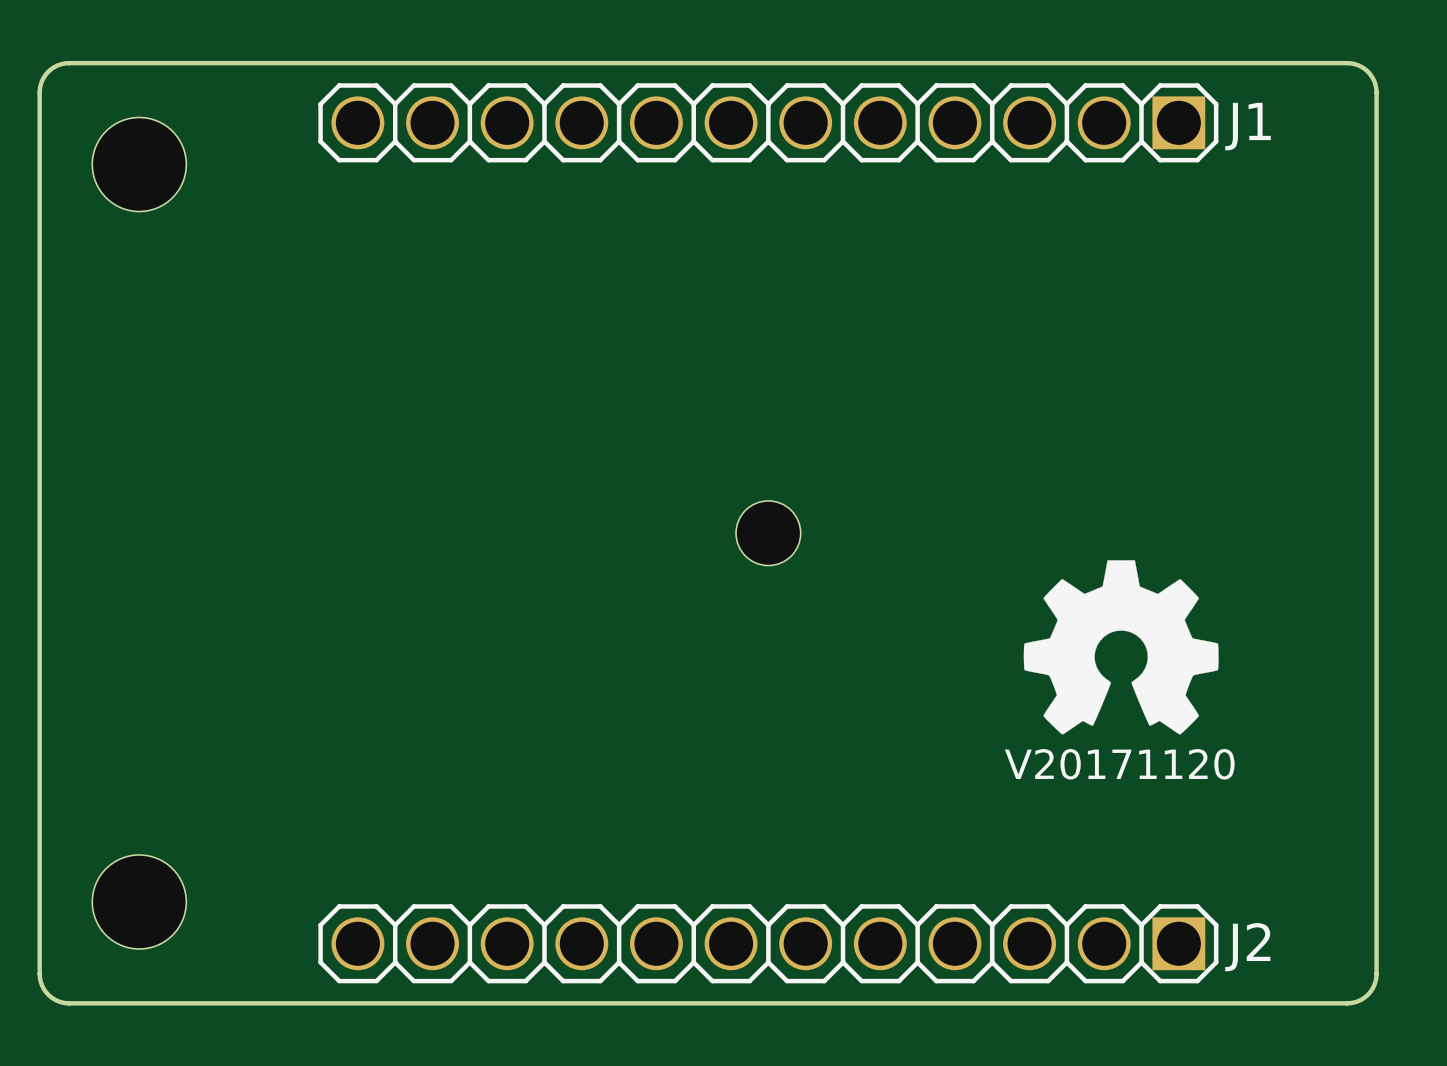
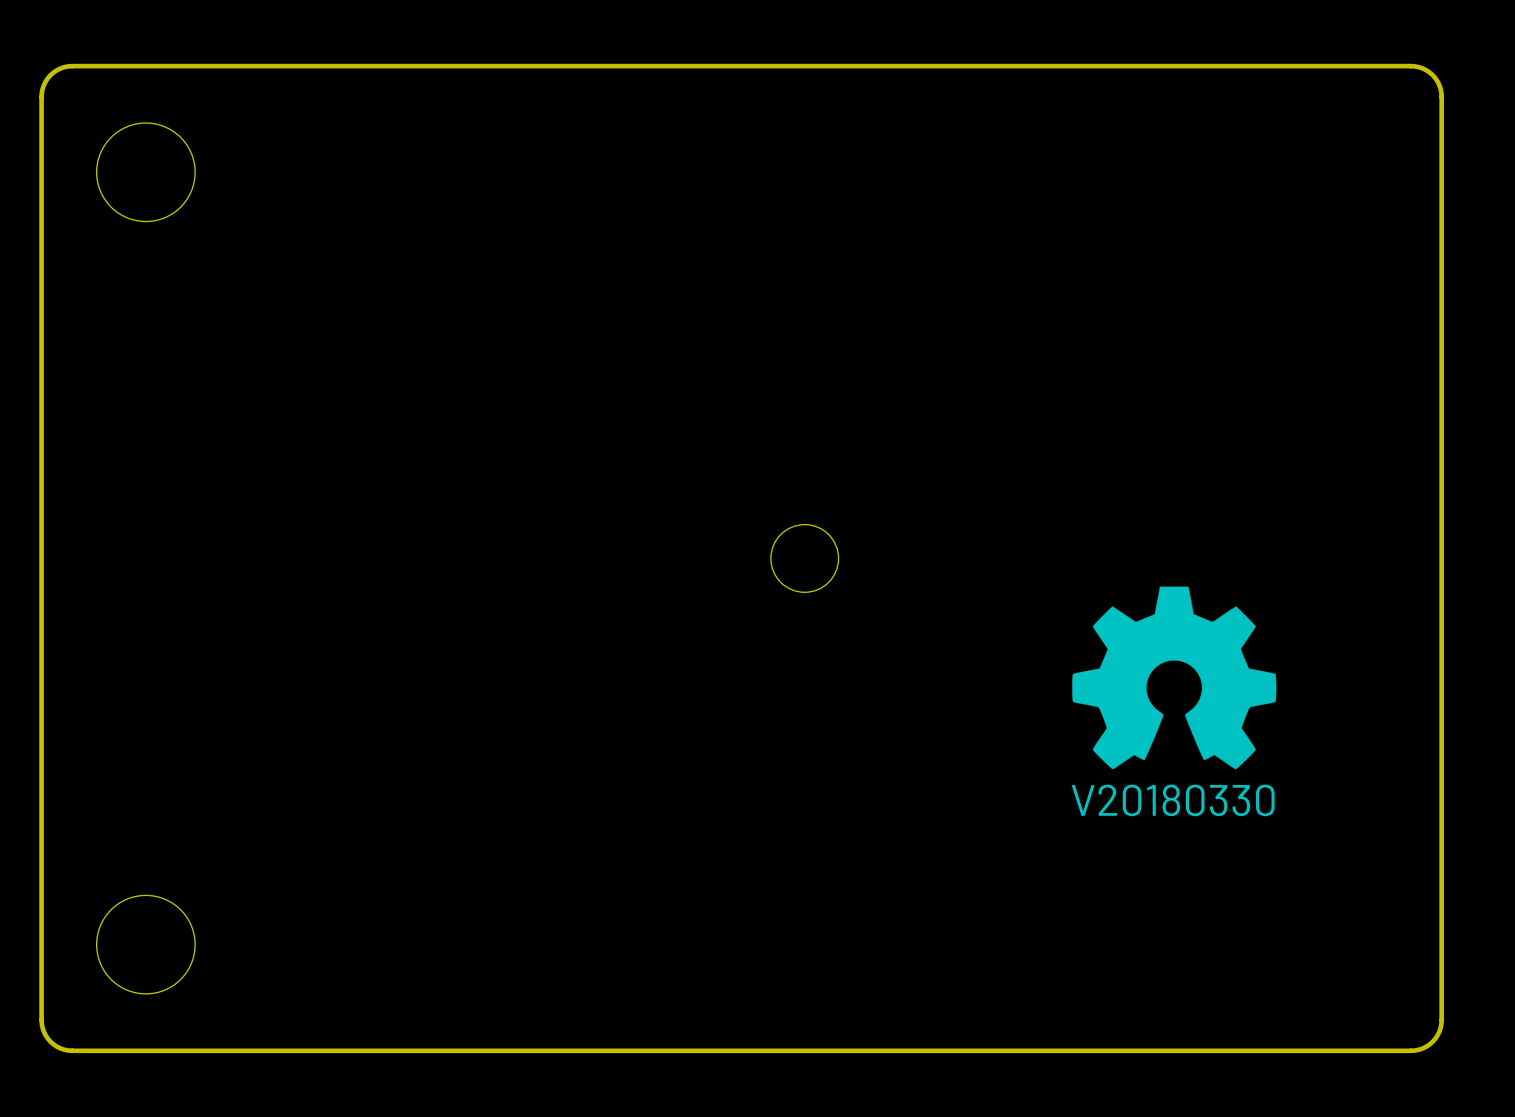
J1: (768, 122) -> none
drawing shape: [1004, 749, 1235, 780] -> [1071, 784, 1275, 817]
J2: (768, 943) -> none

